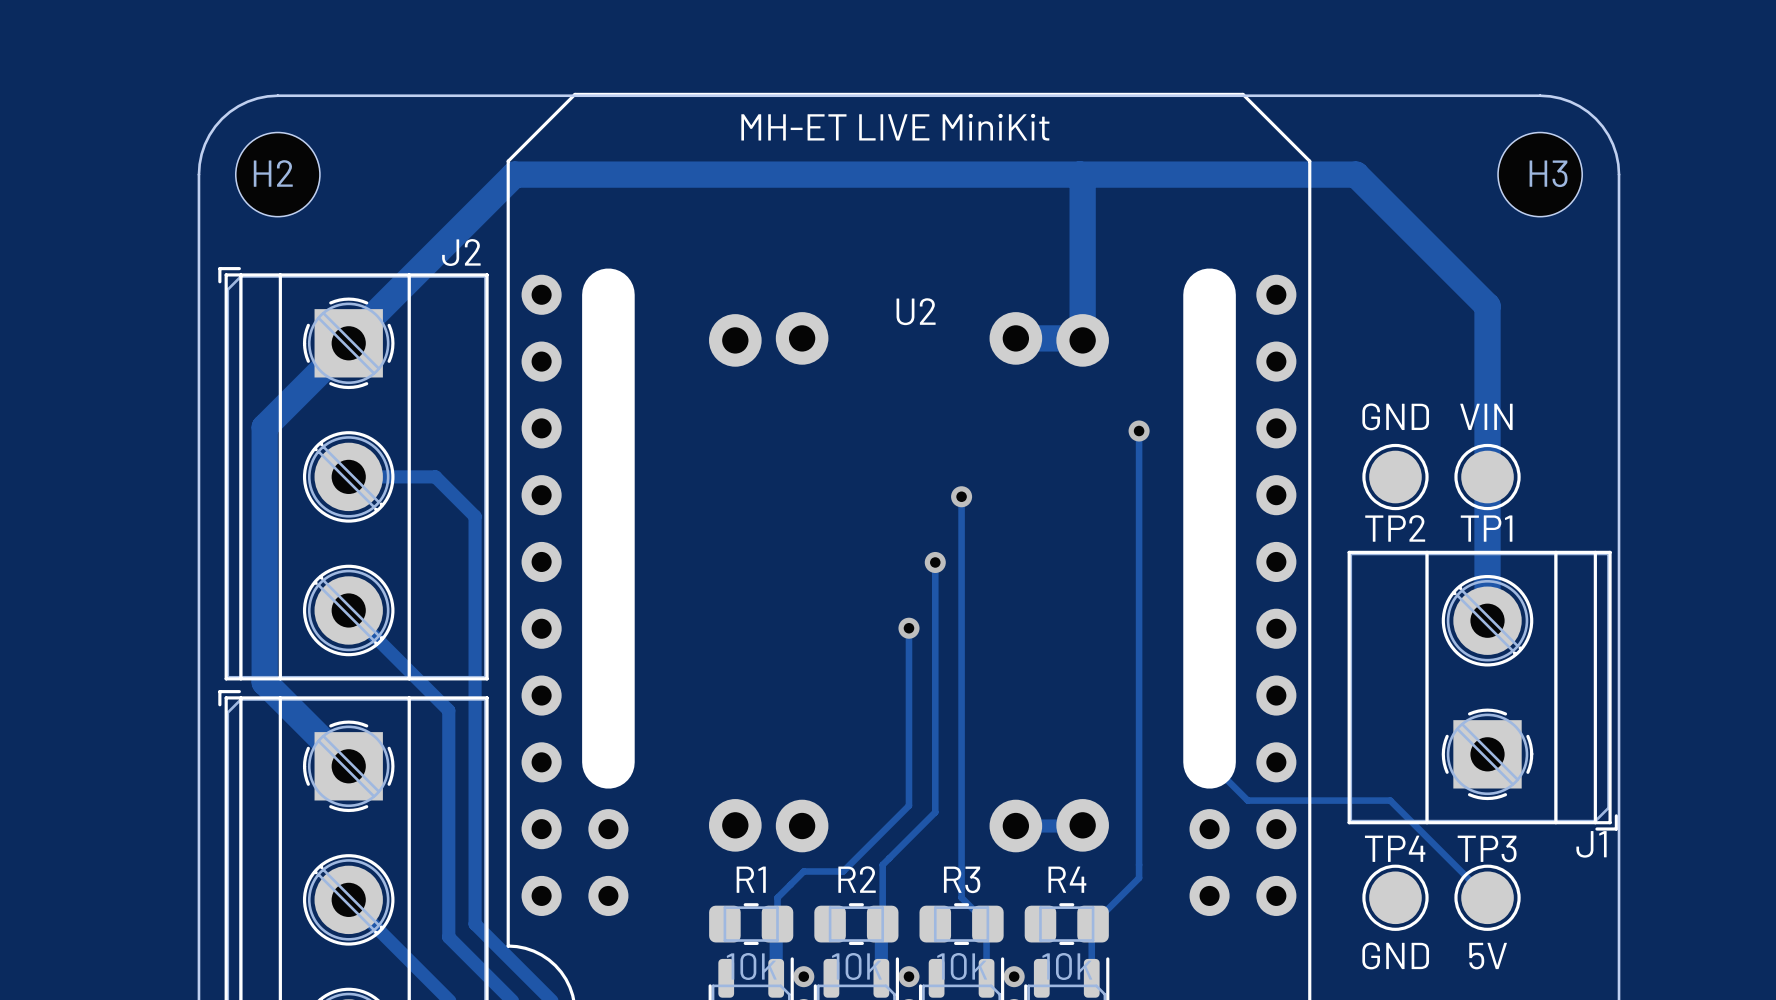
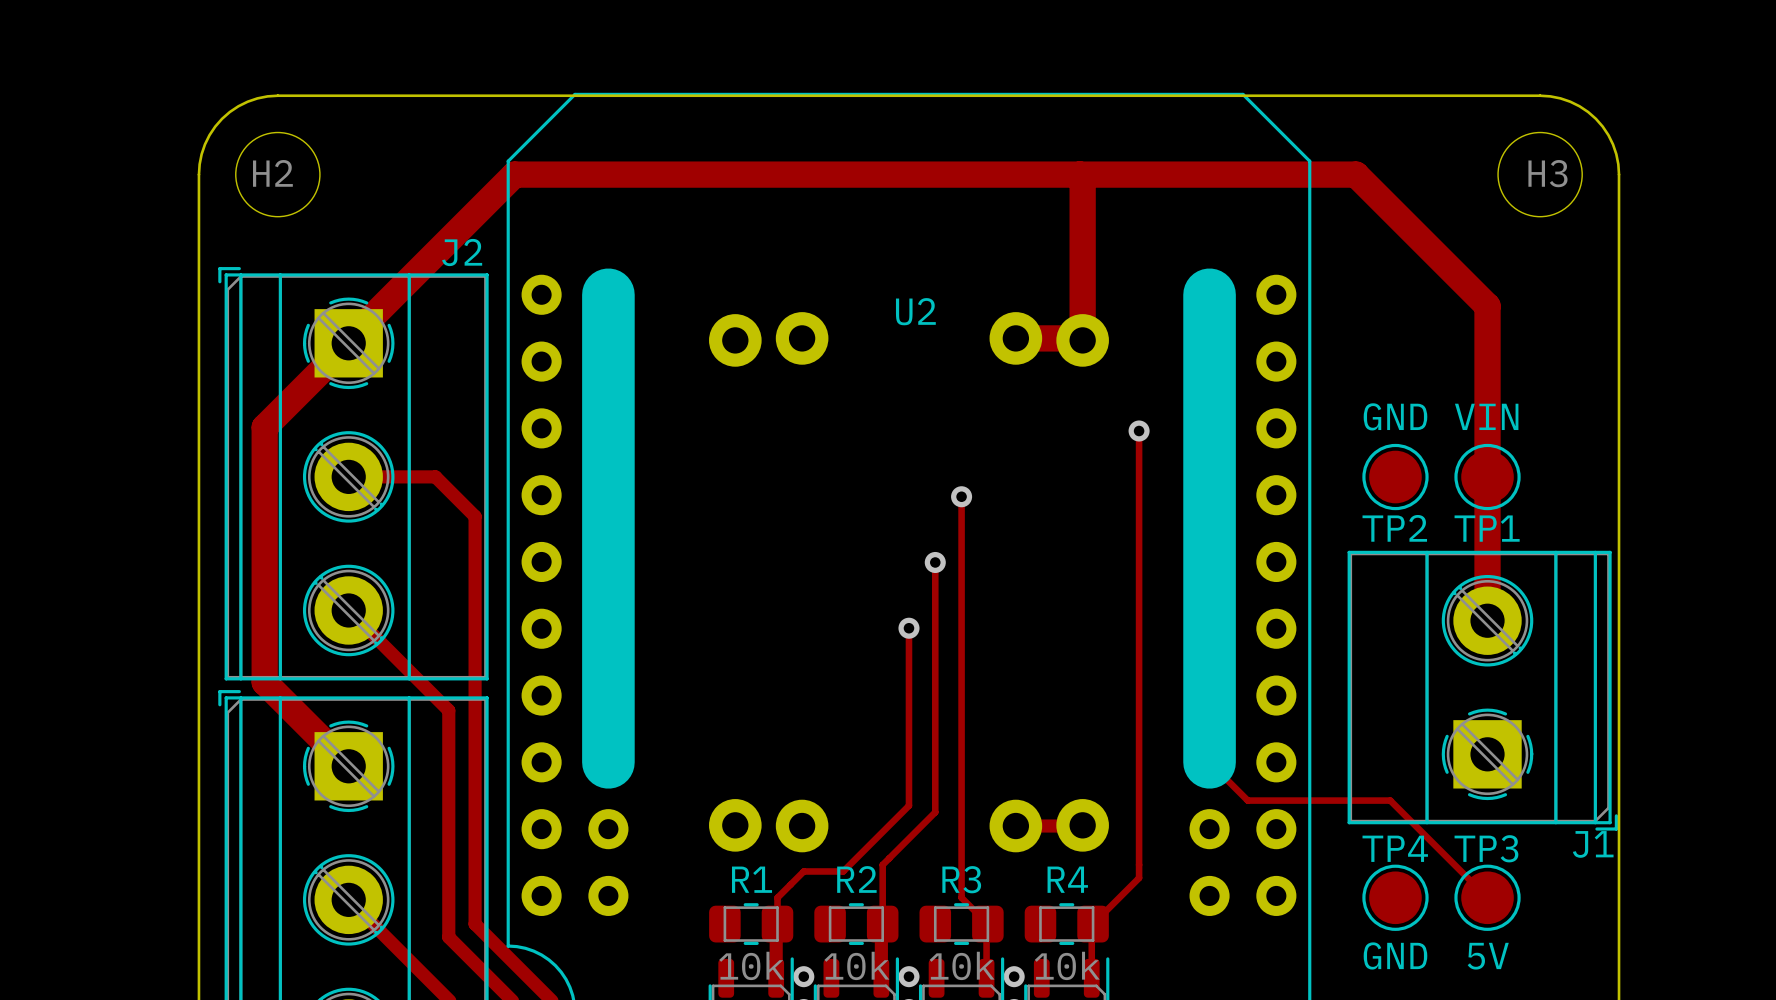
text: MH-ET LIVE MiniKit (895, 127) -> none

